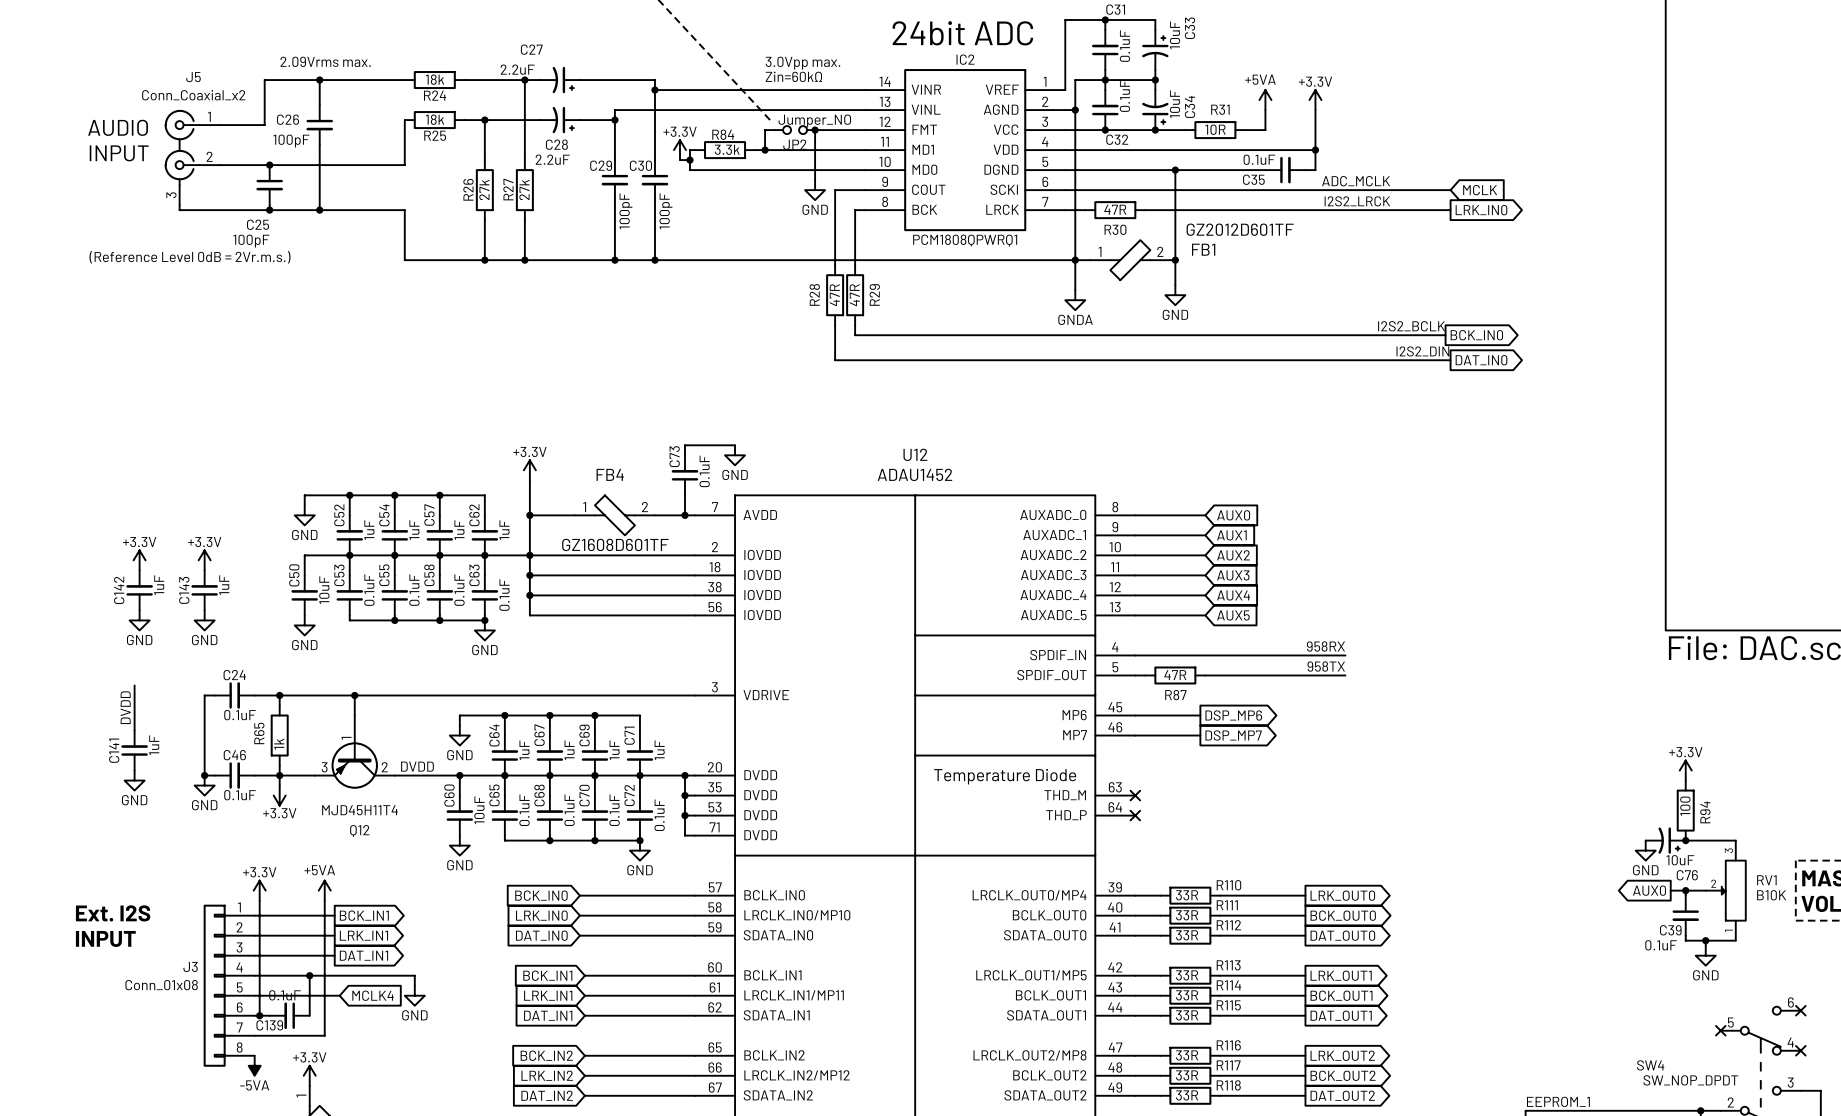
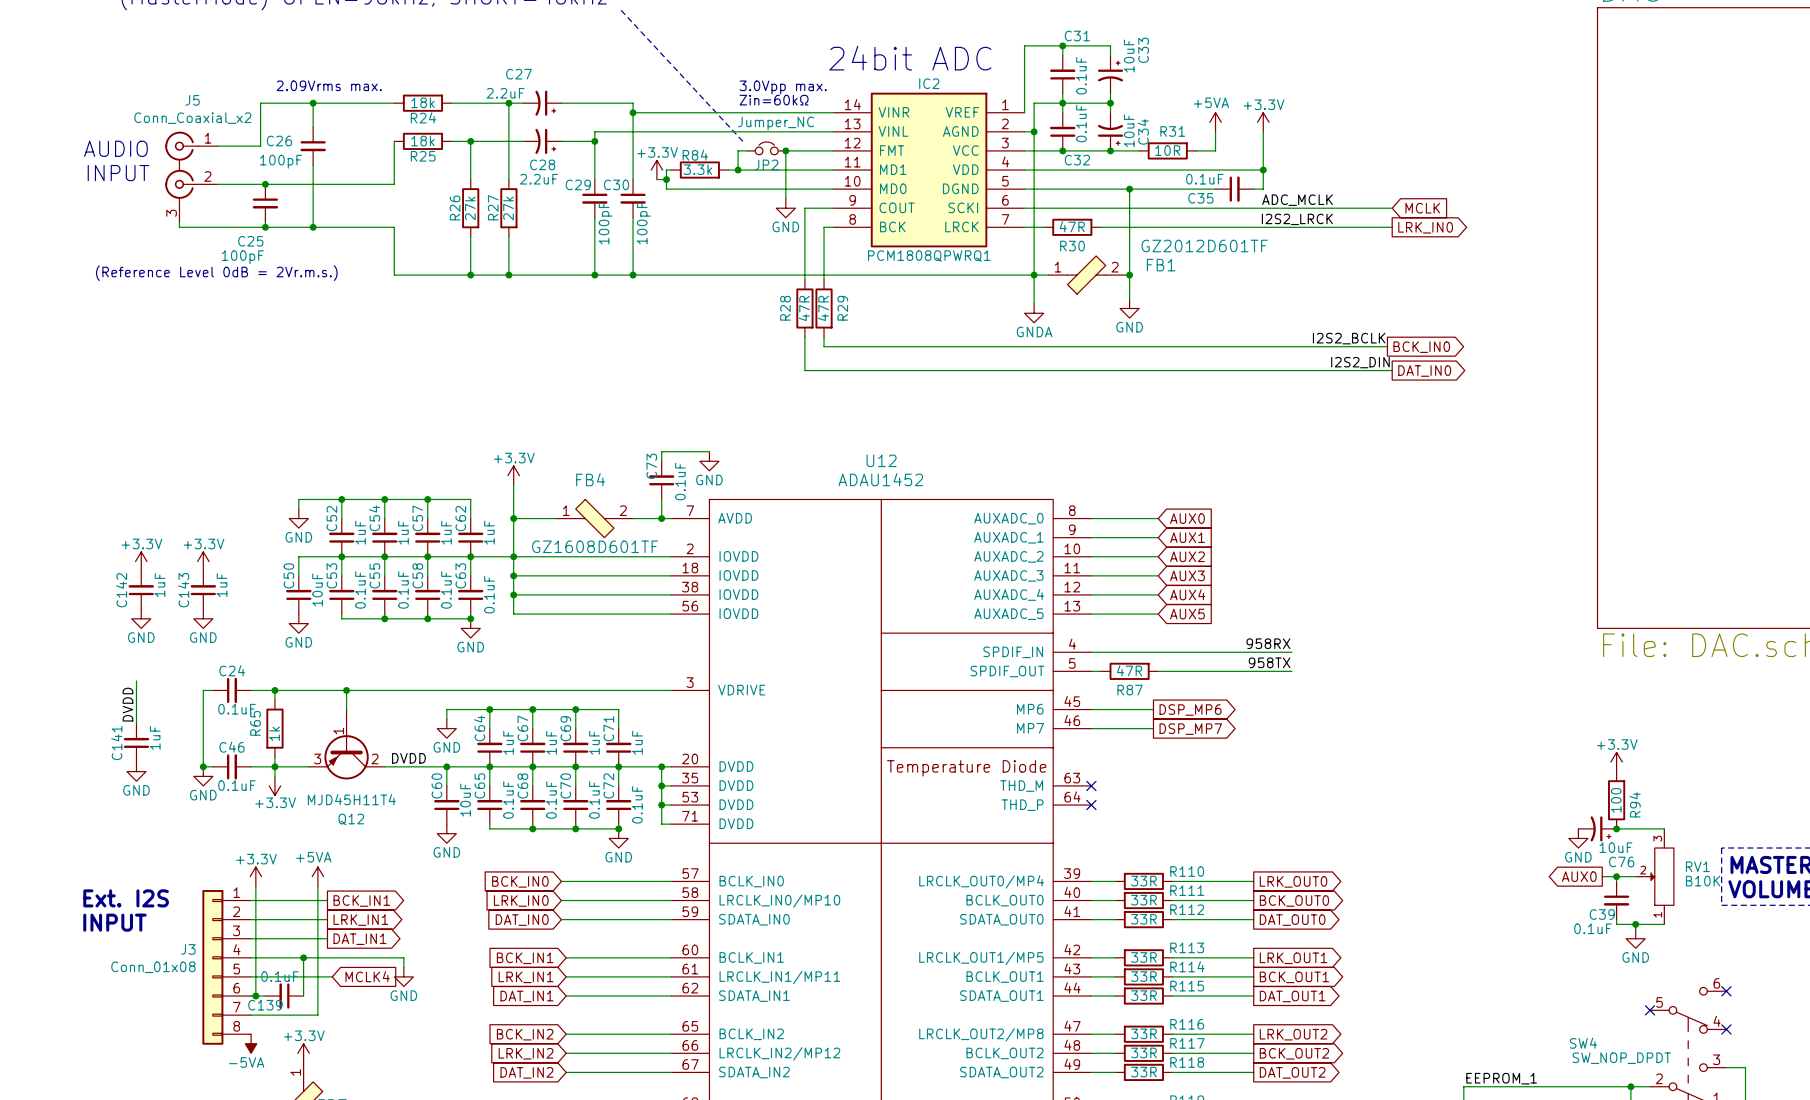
JP2 value: Jumper_NO (814, 121) -> Jumper_NC (776, 123)
JP2 symbol: [775, 126, 816, 135] -> [747, 141, 786, 155]

